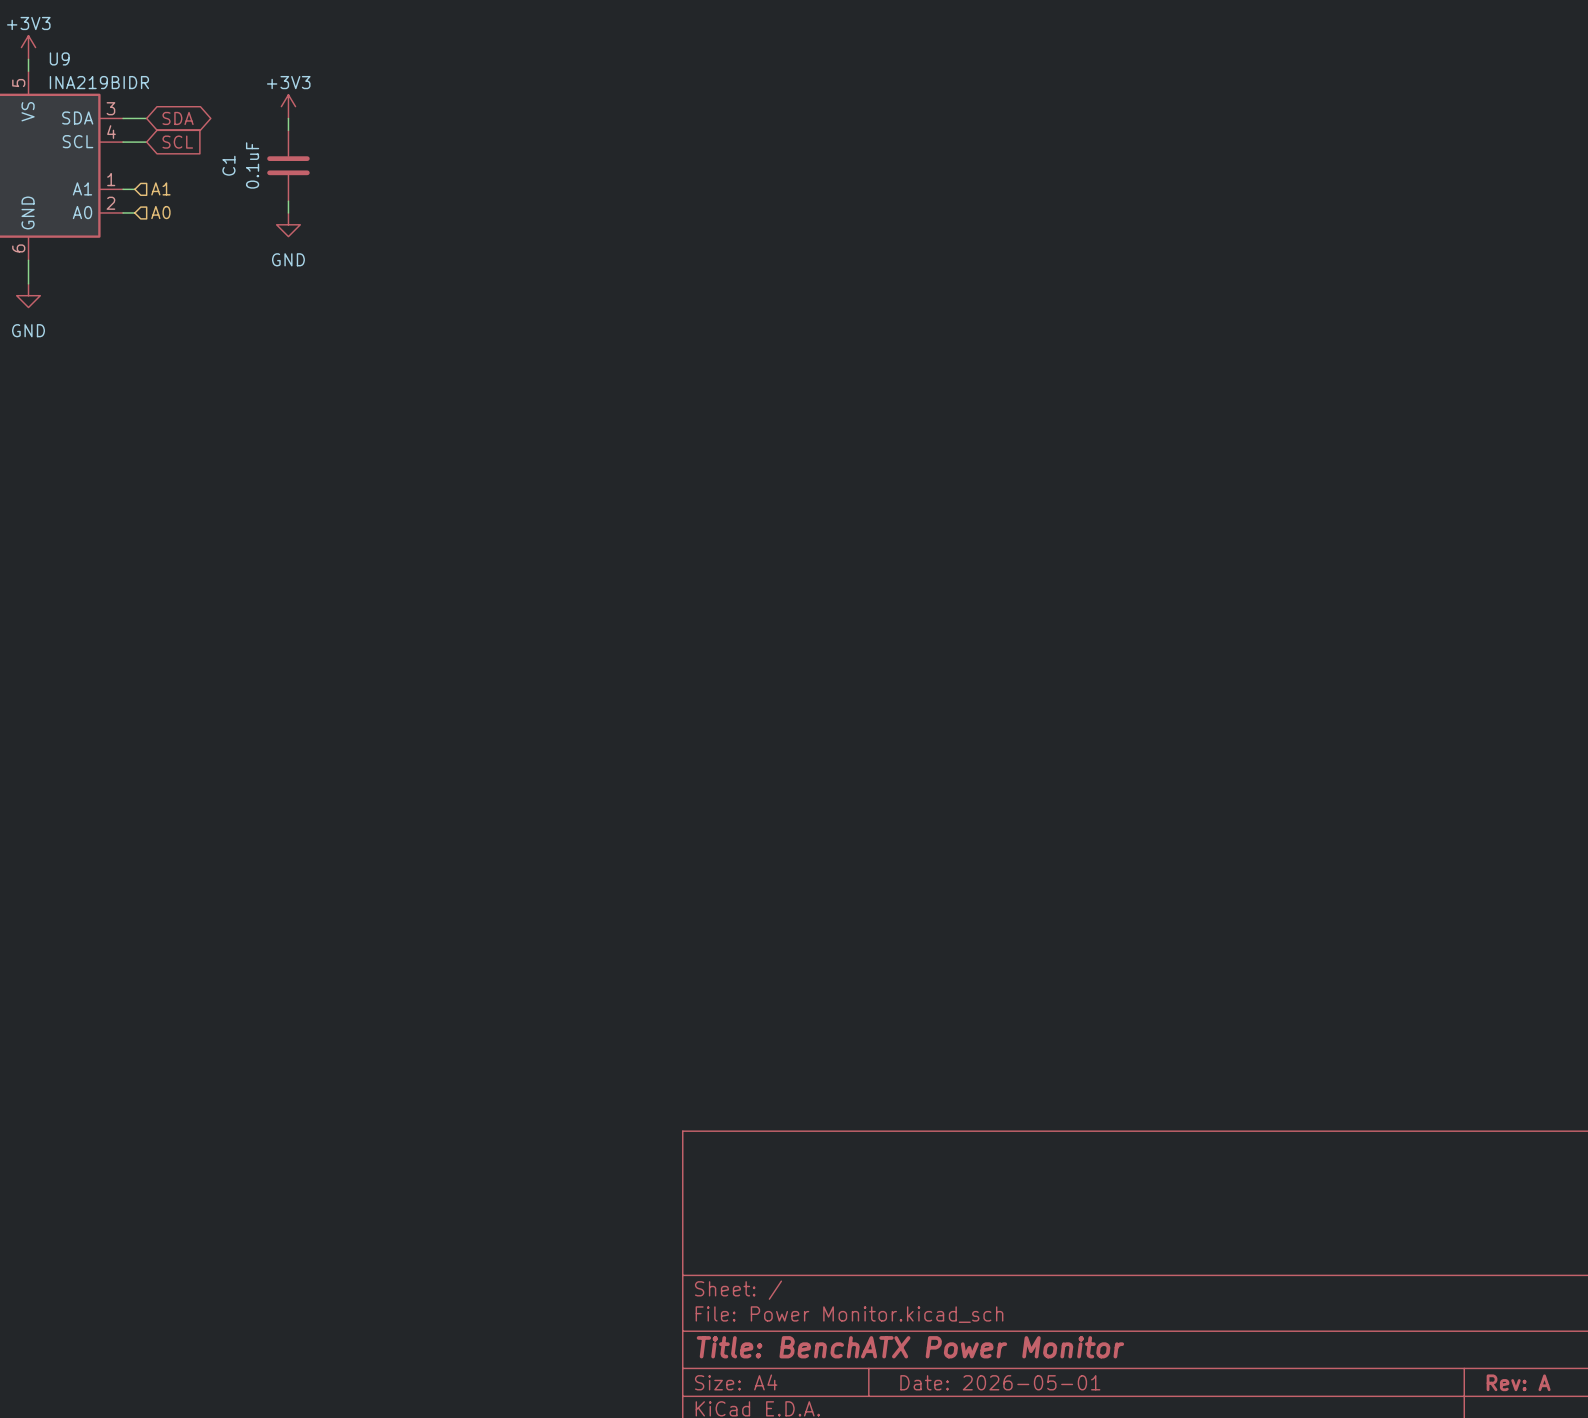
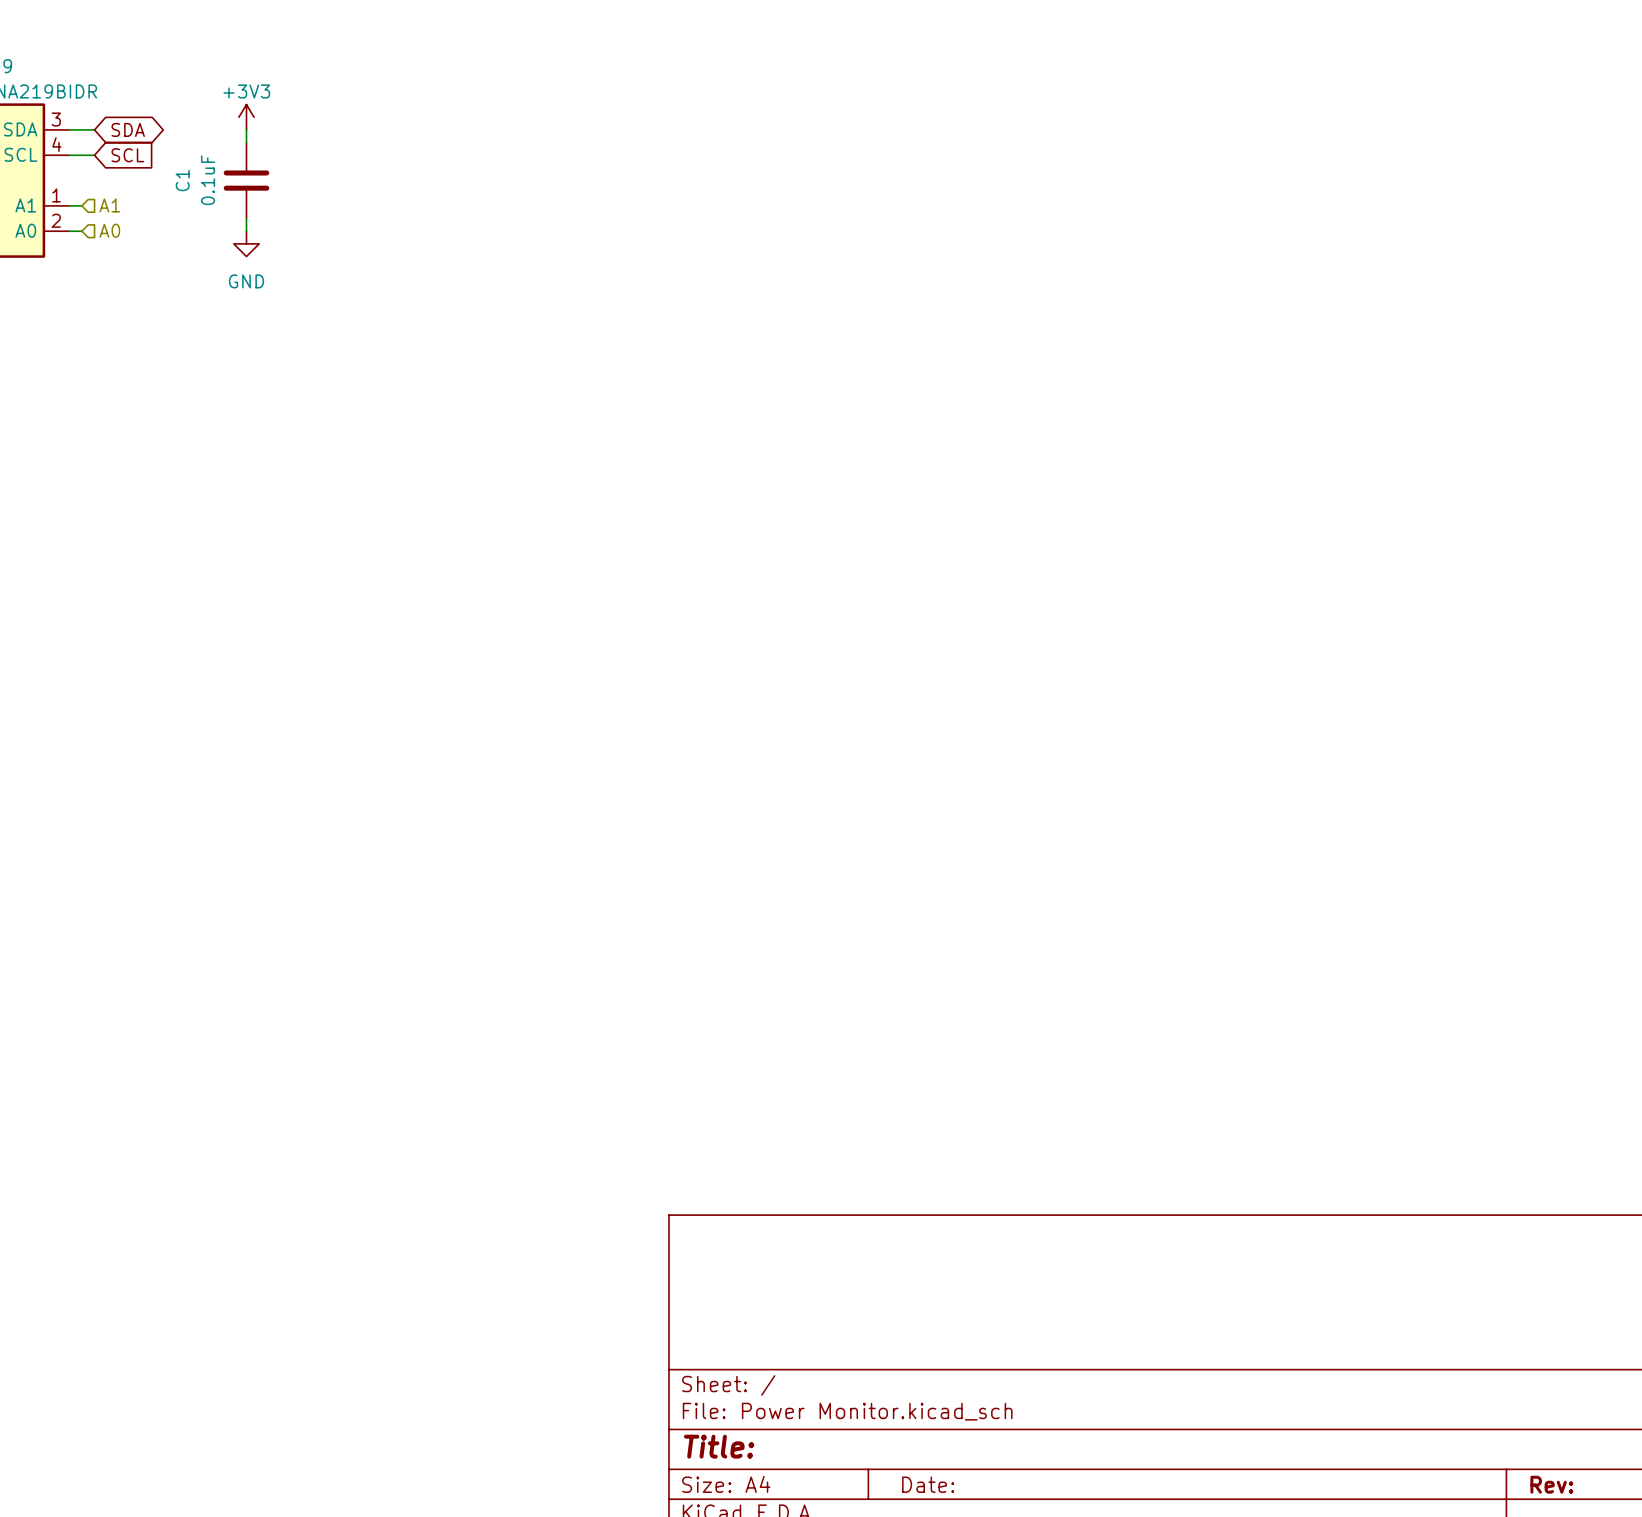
title block: Title: BenchATX Power Monitor (910, 1347) -> Title: (719, 1446)
title block: Date: 2026-05-01 (1000, 1382) -> Date: (928, 1484)
title block: Rev: A (1518, 1382) -> Rev: (1551, 1484)

